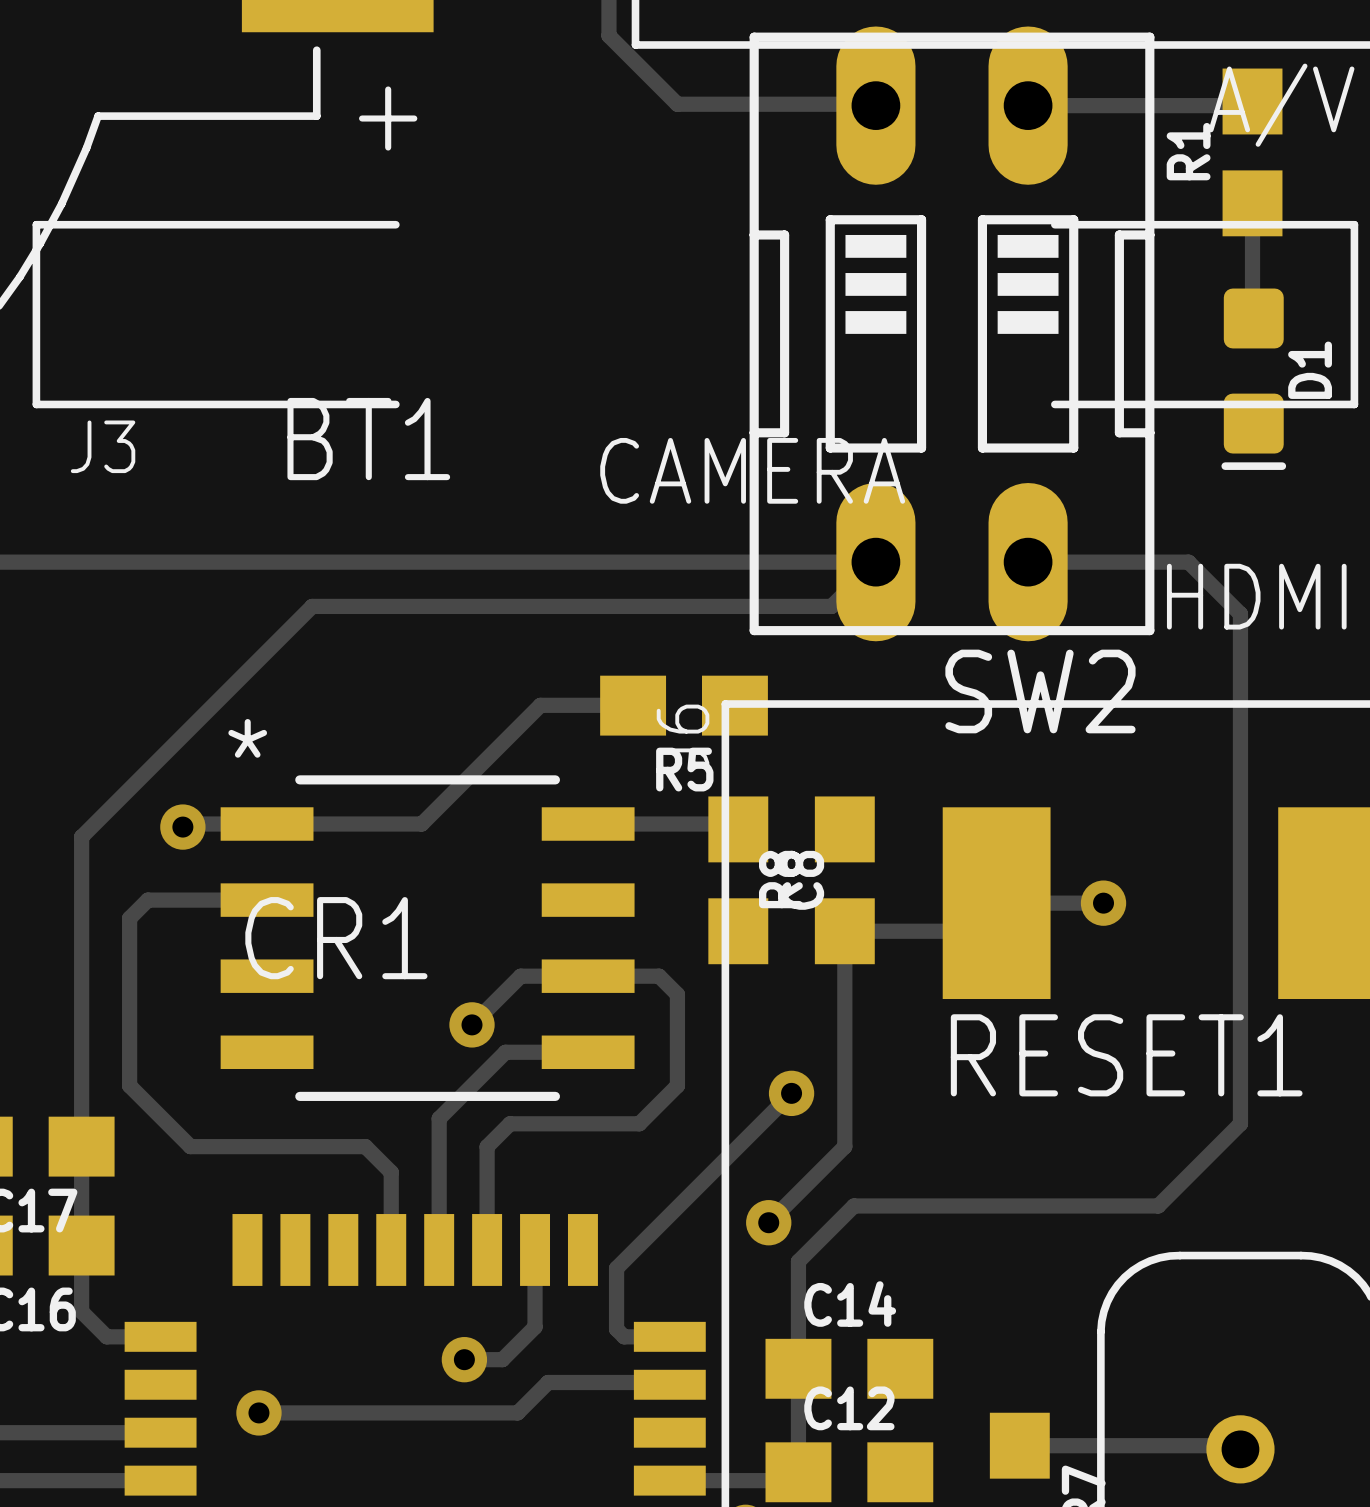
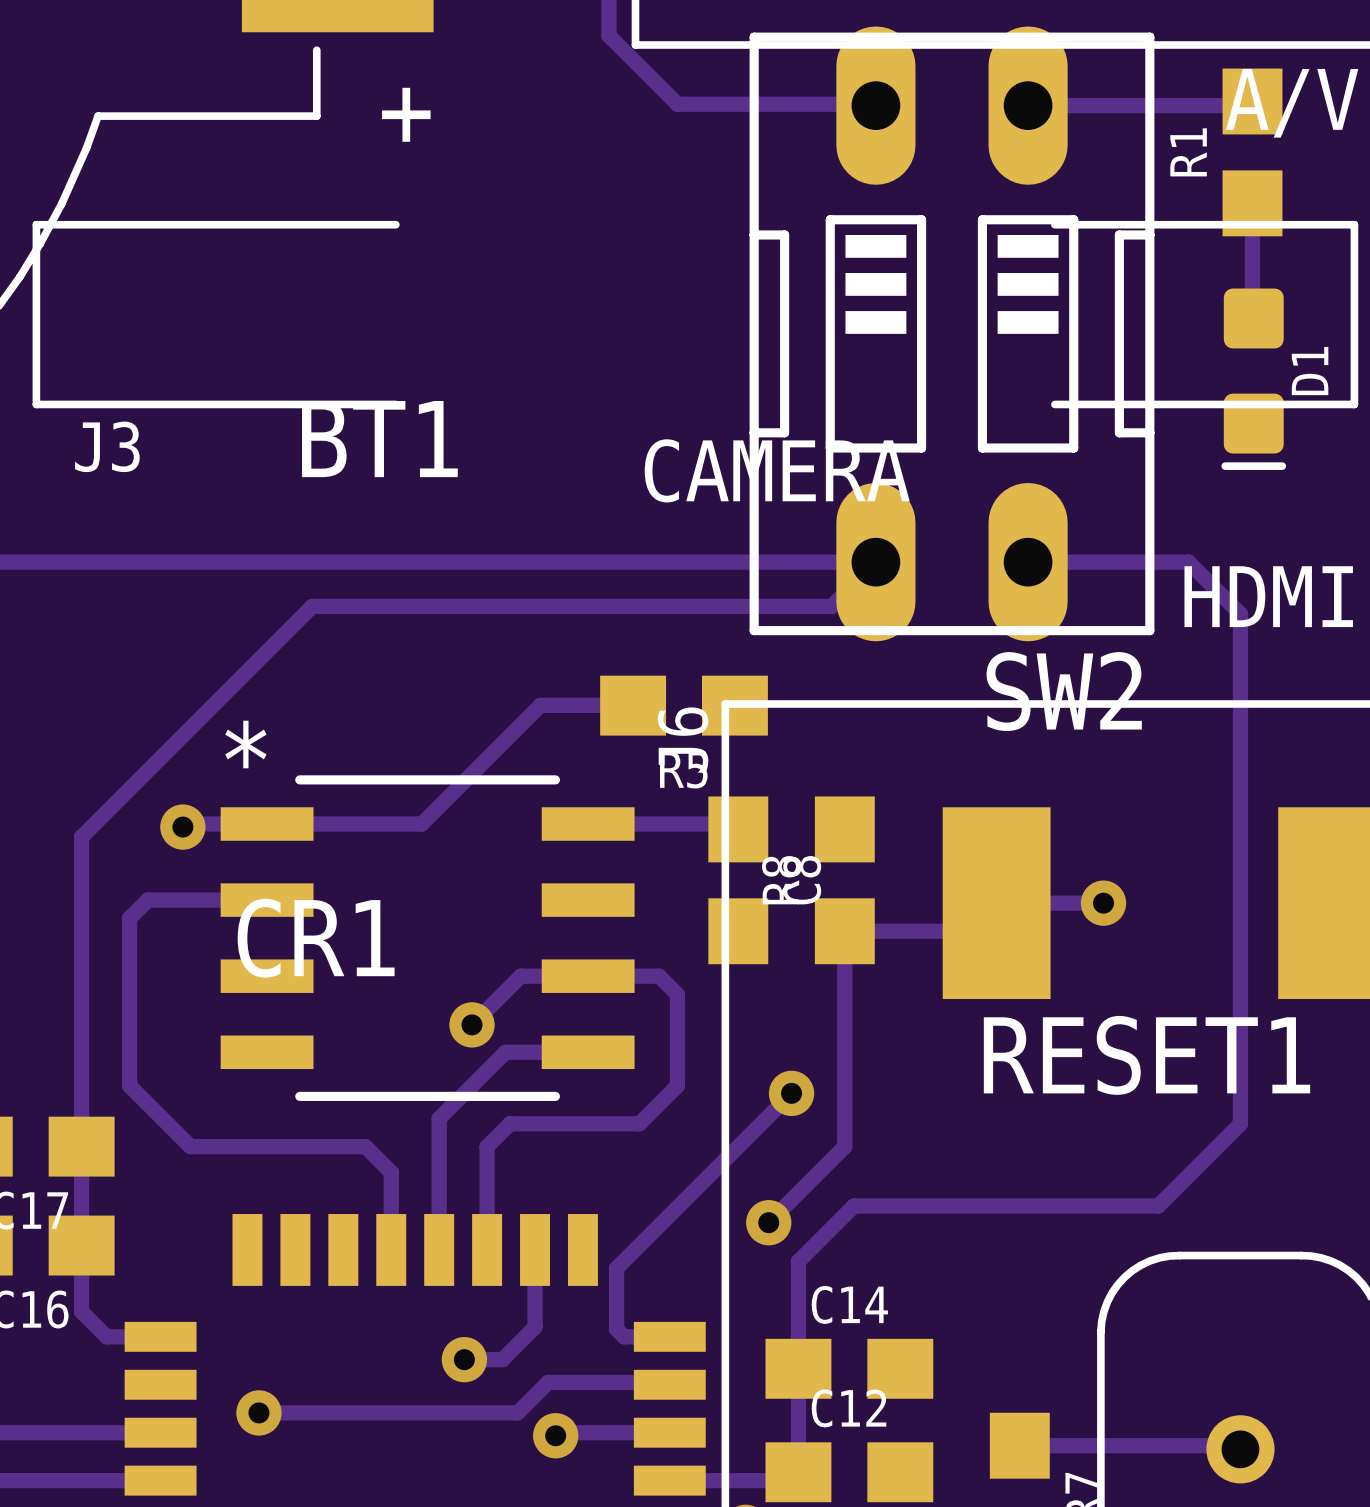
track: none -> (669, 1432) (558, 1432) (555, 1435)
via: none -> (555, 1435)

